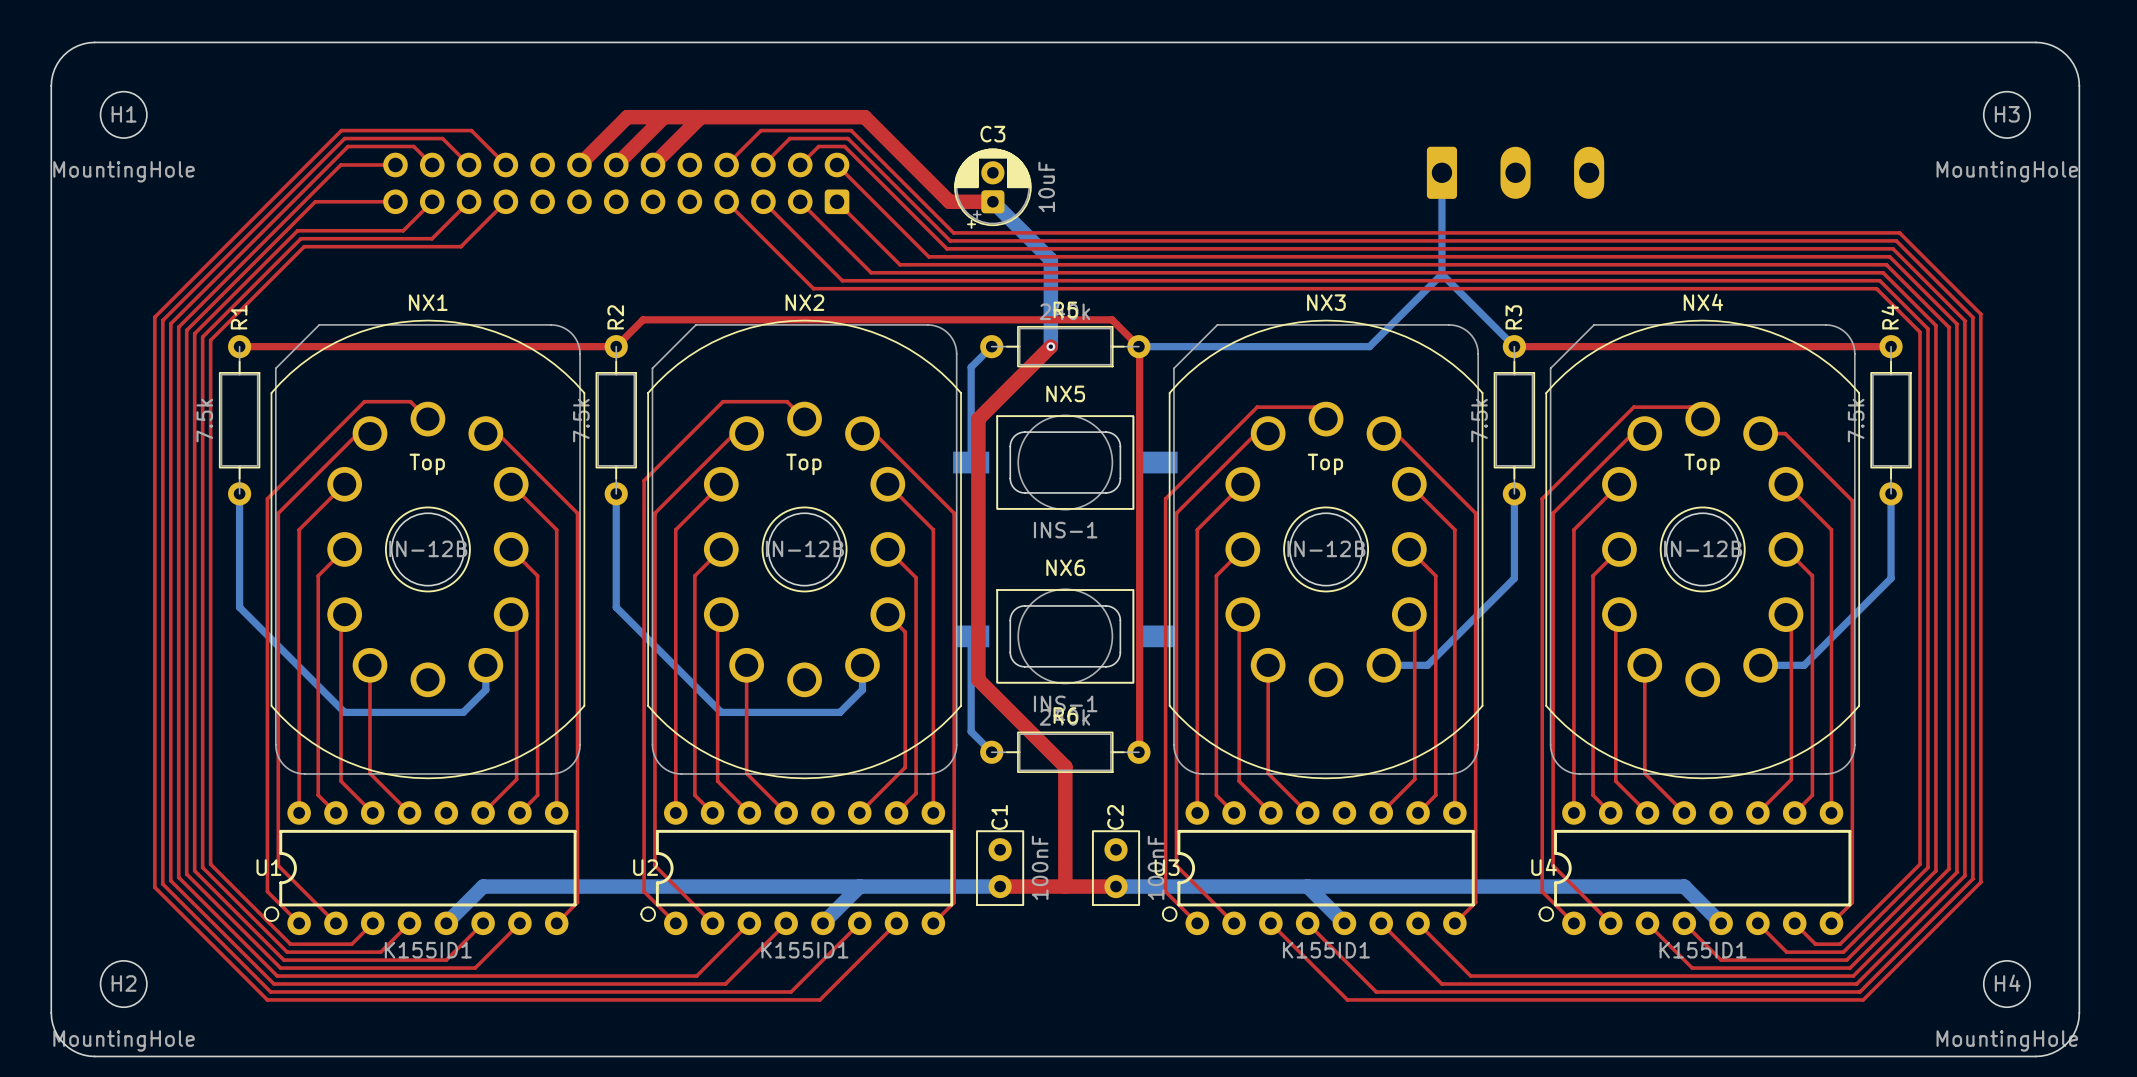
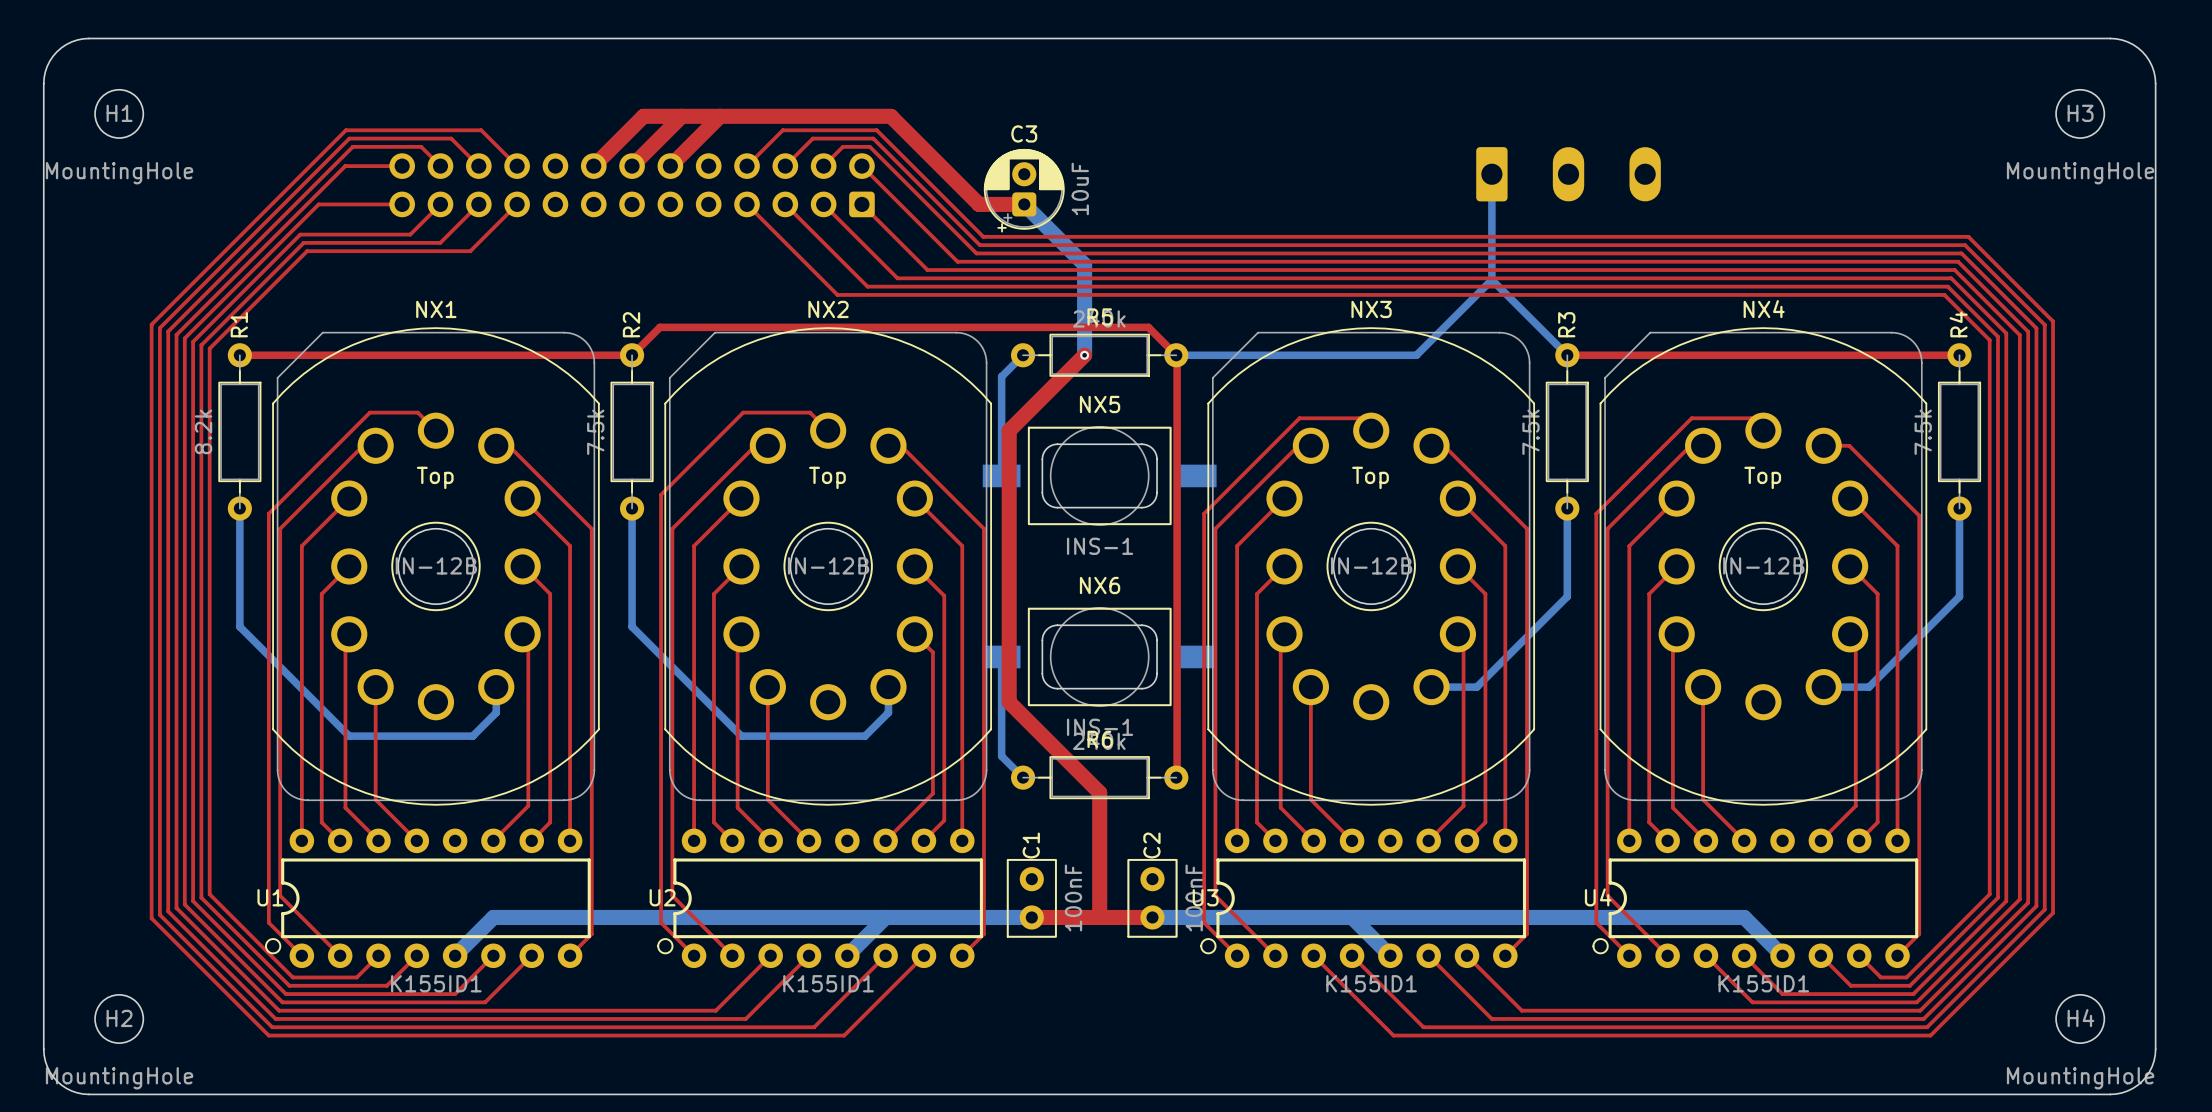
R1 value: 7.5k (204, 420) -> 8.2k (203, 431)

